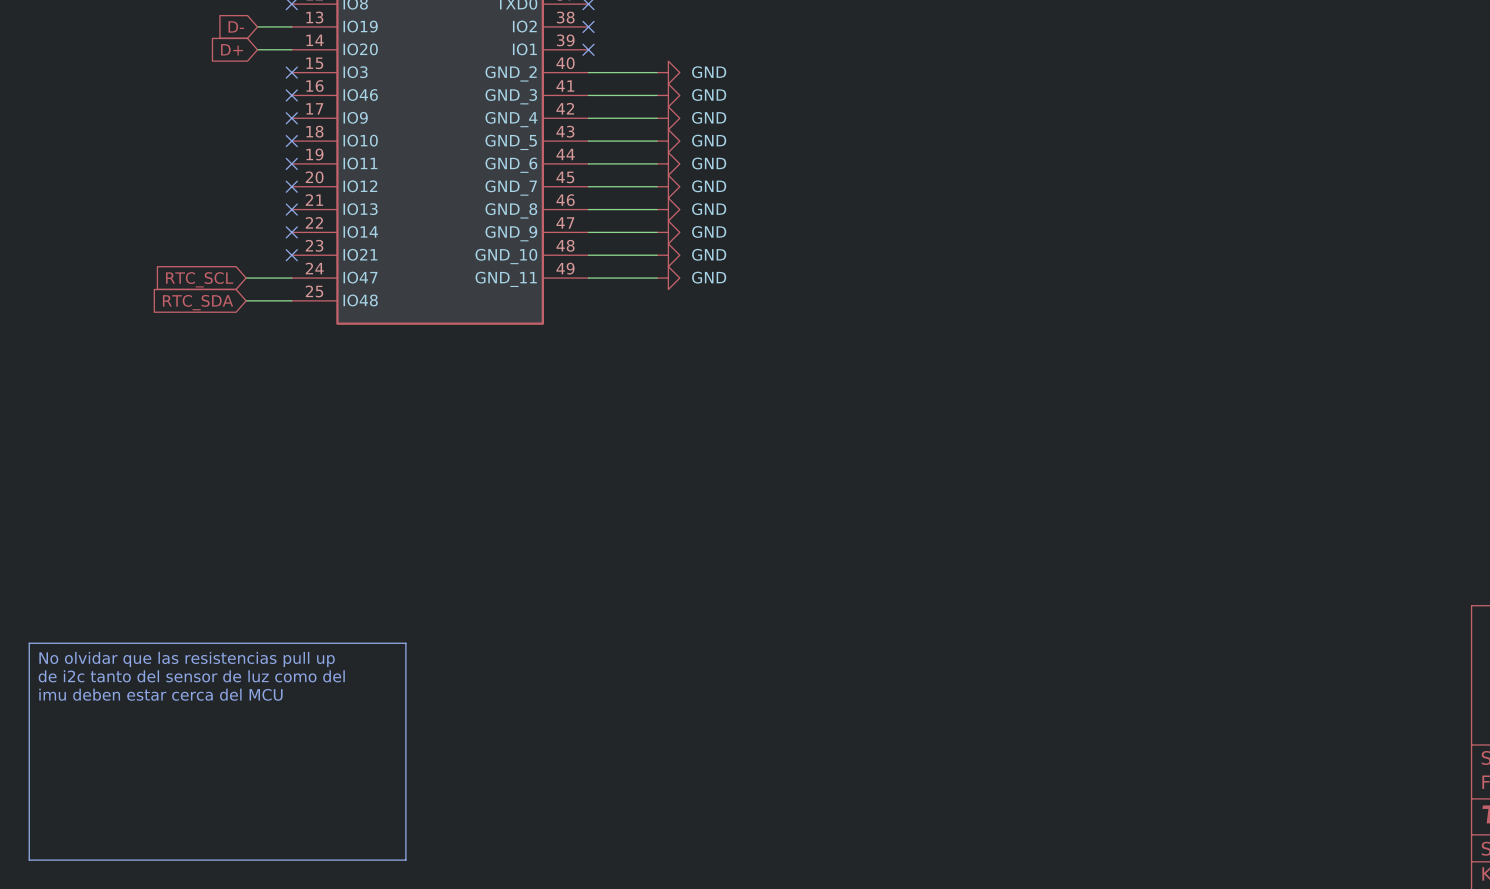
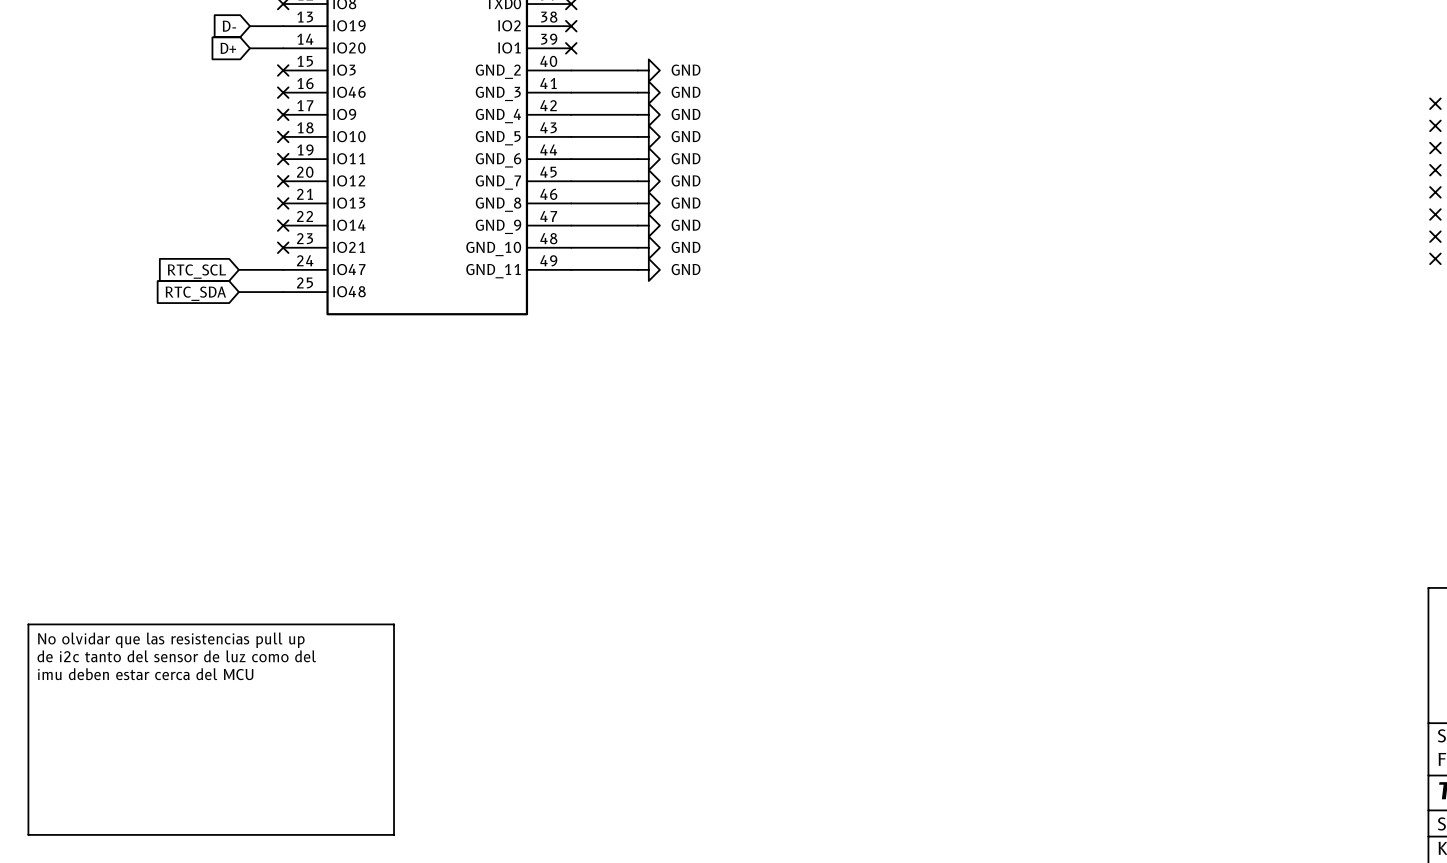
no-connect mark: none -> (1435, 103)
no-connect mark: none -> (1435, 125)
no-connect mark: none -> (1435, 148)
no-connect mark: none -> (1435, 170)
no-connect mark: none -> (1435, 192)
no-connect mark: none -> (1435, 214)
no-connect mark: none -> (1435, 236)
no-connect mark: none -> (1435, 258)

